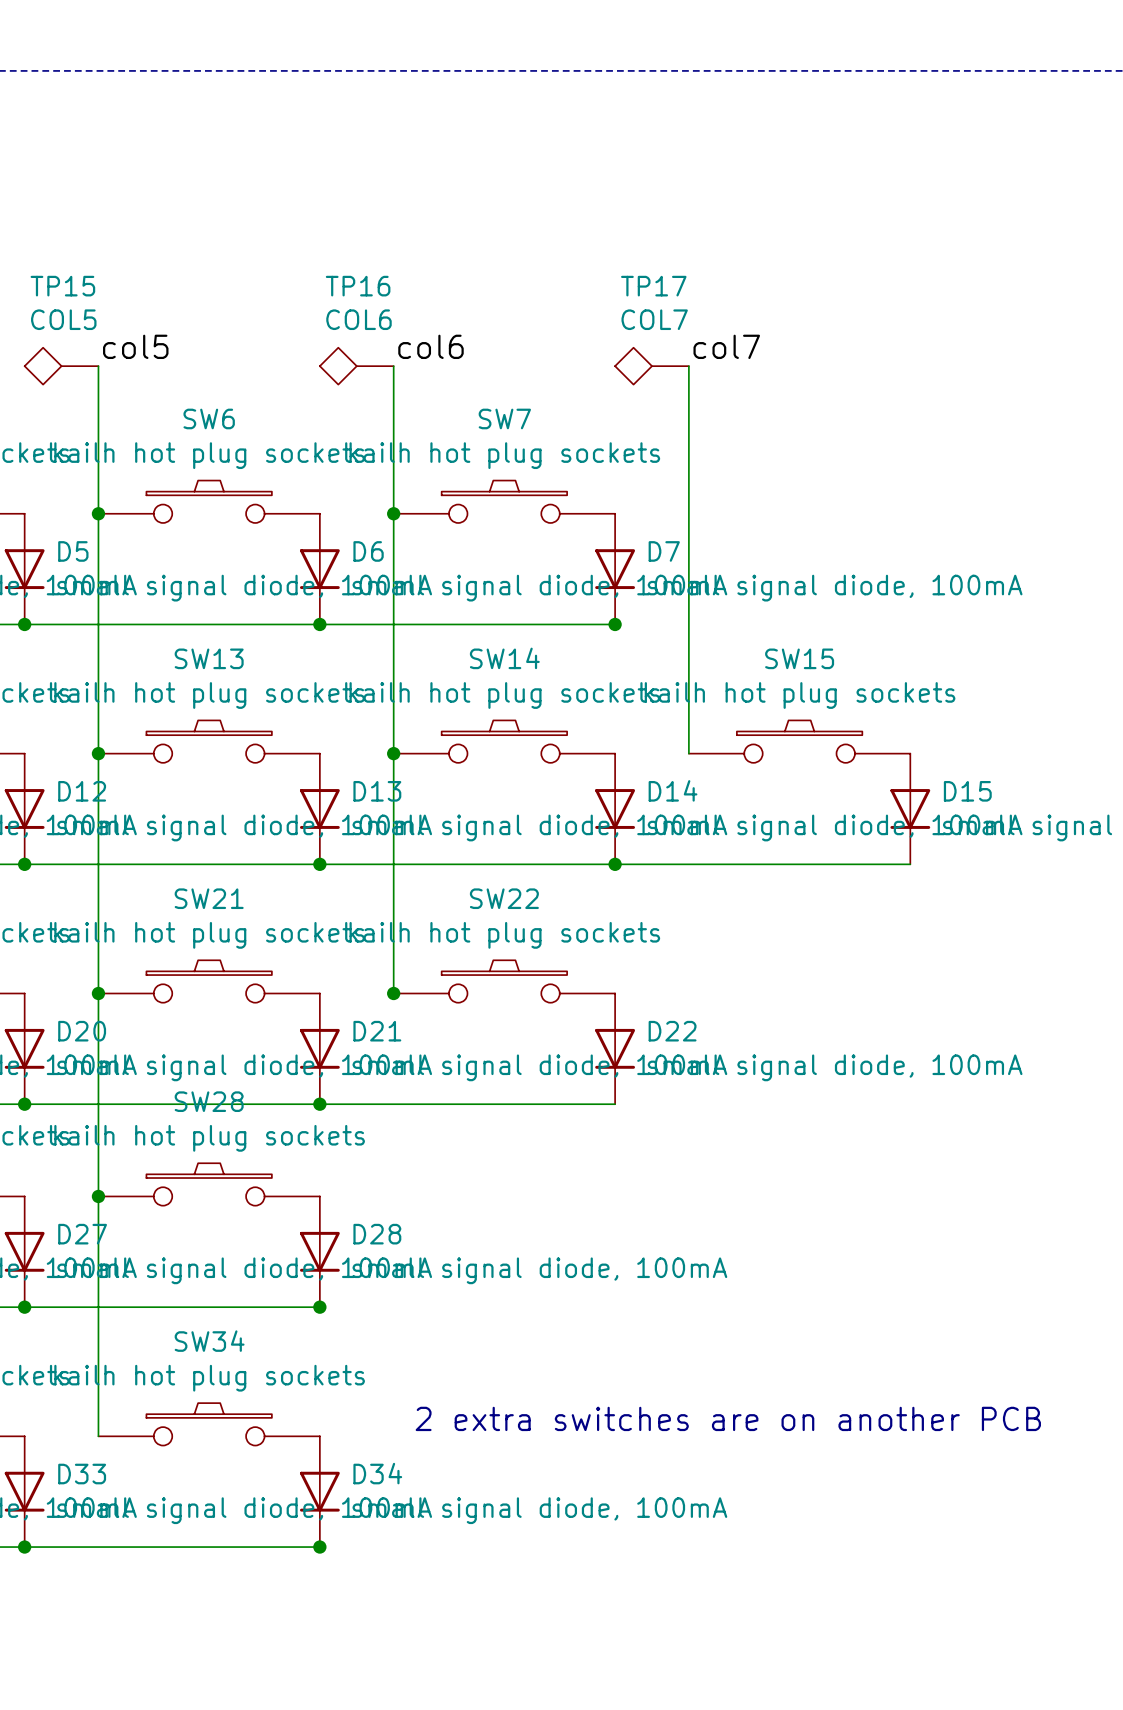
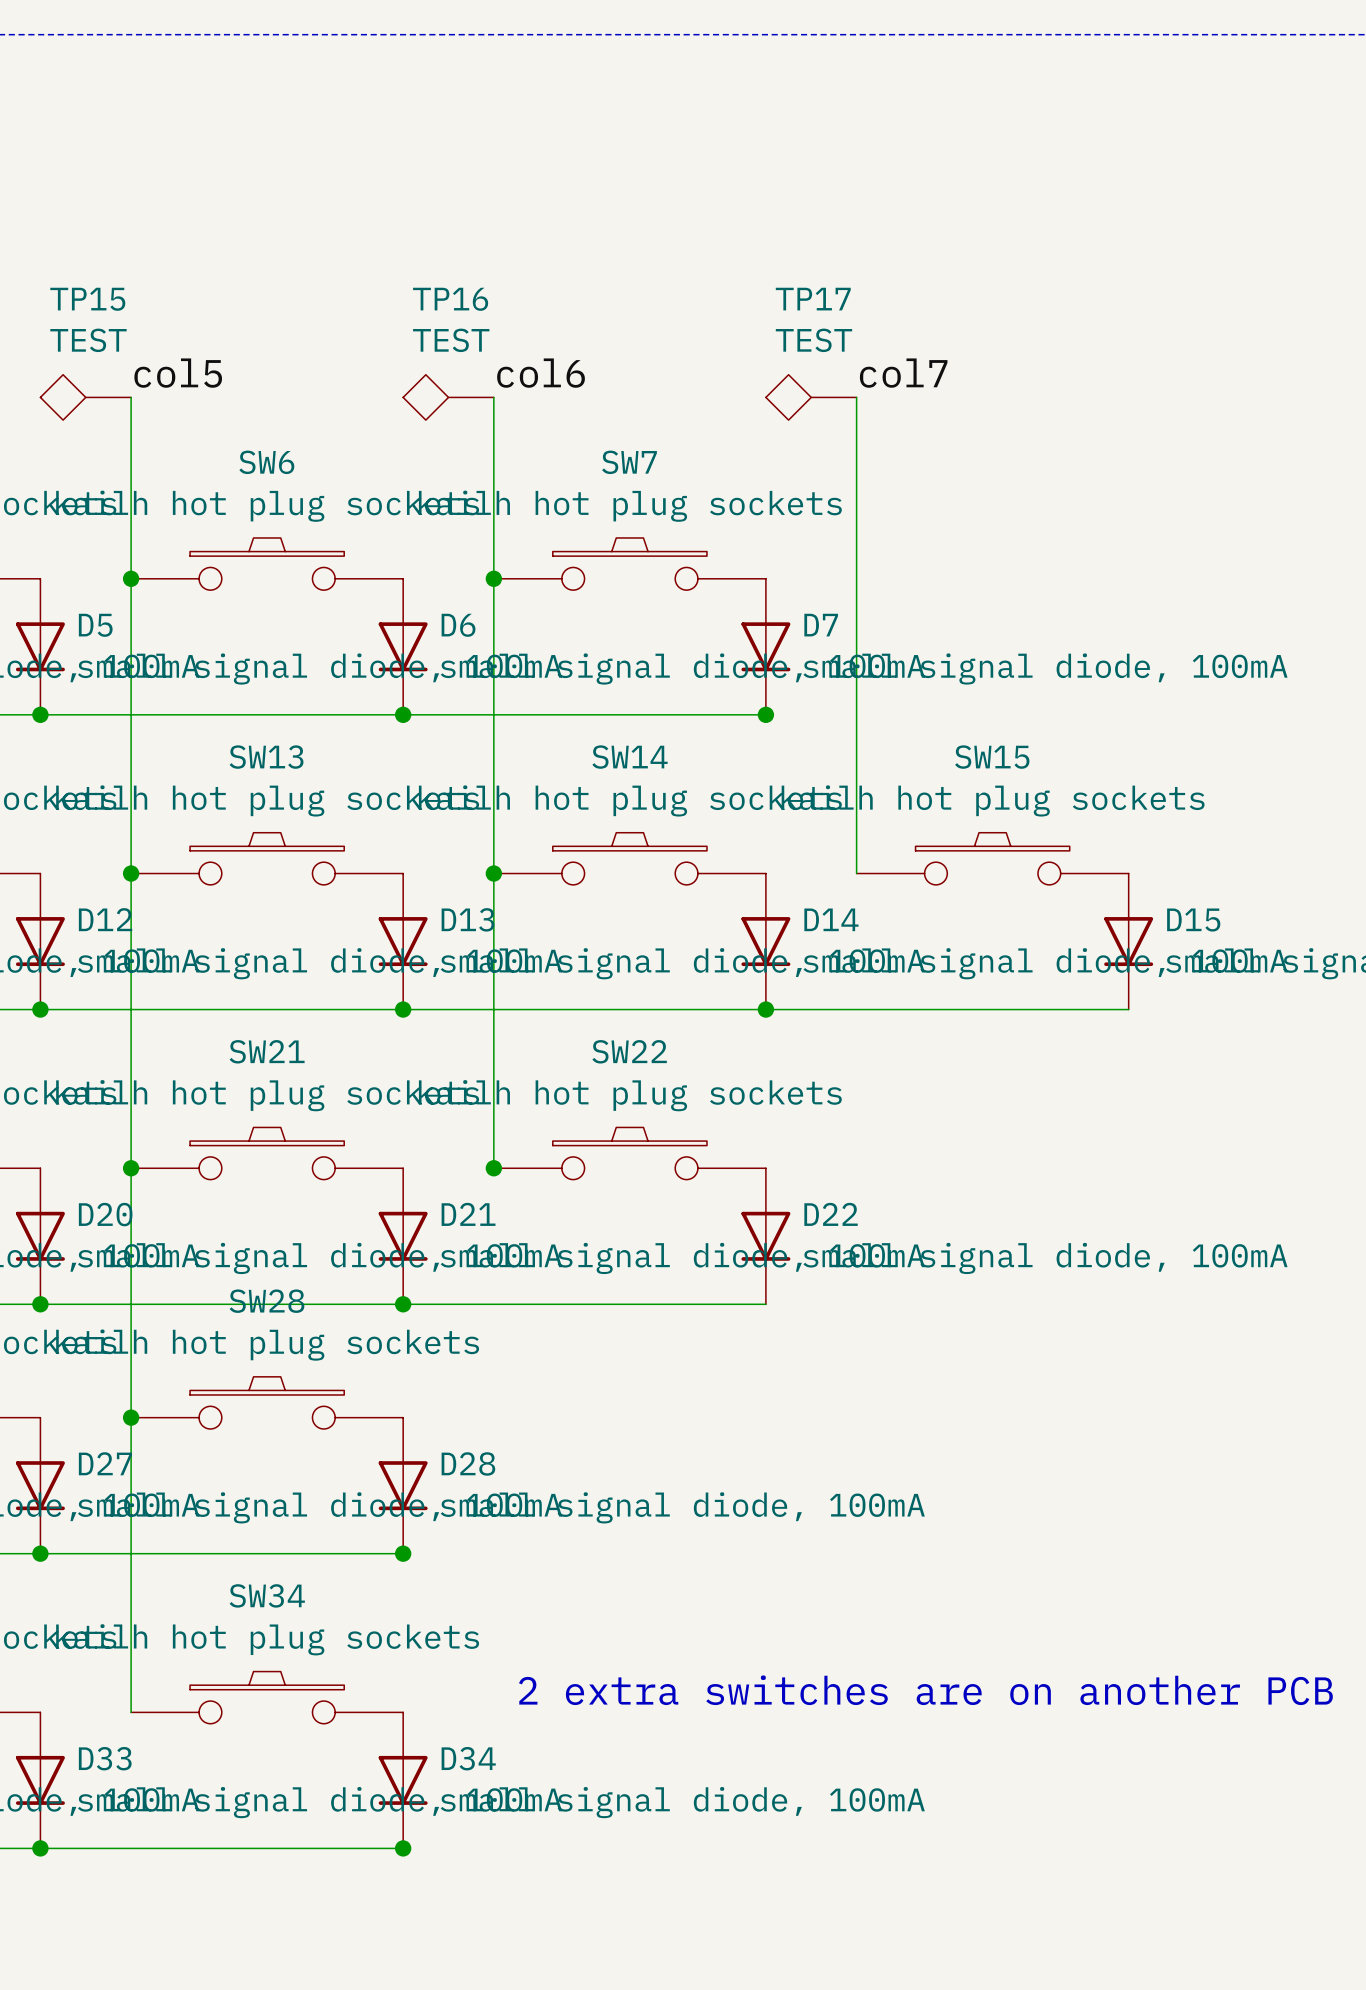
TP15 value: COL5 (63, 319) -> TEST (88, 340)
TP16 value: COL6 (358, 319) -> TEST (451, 340)
TP17 value: COL7 (654, 319) -> TEST (813, 340)

